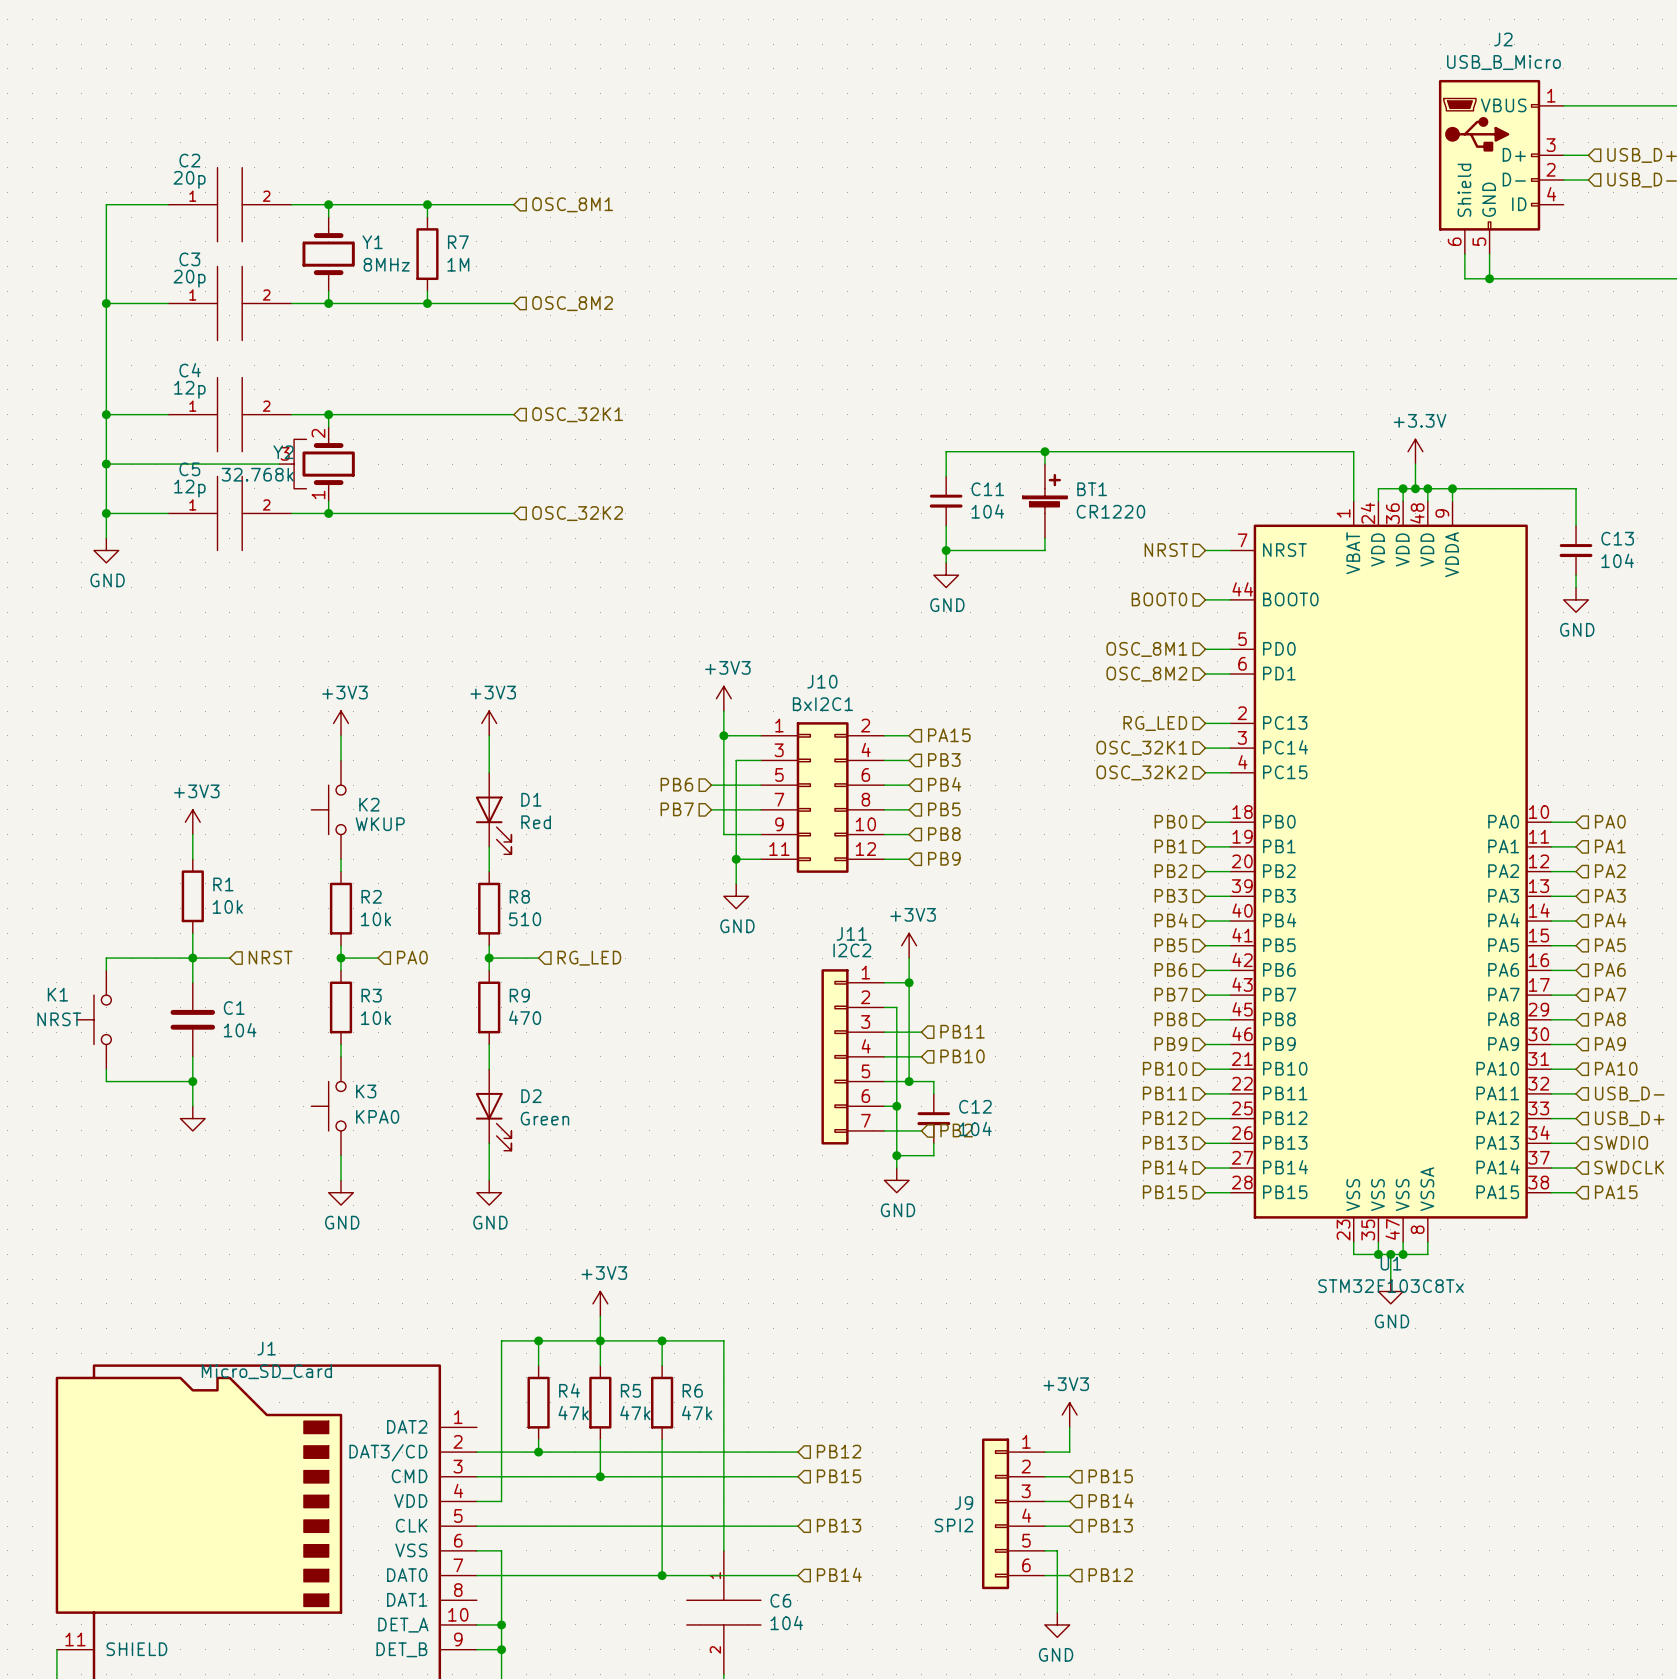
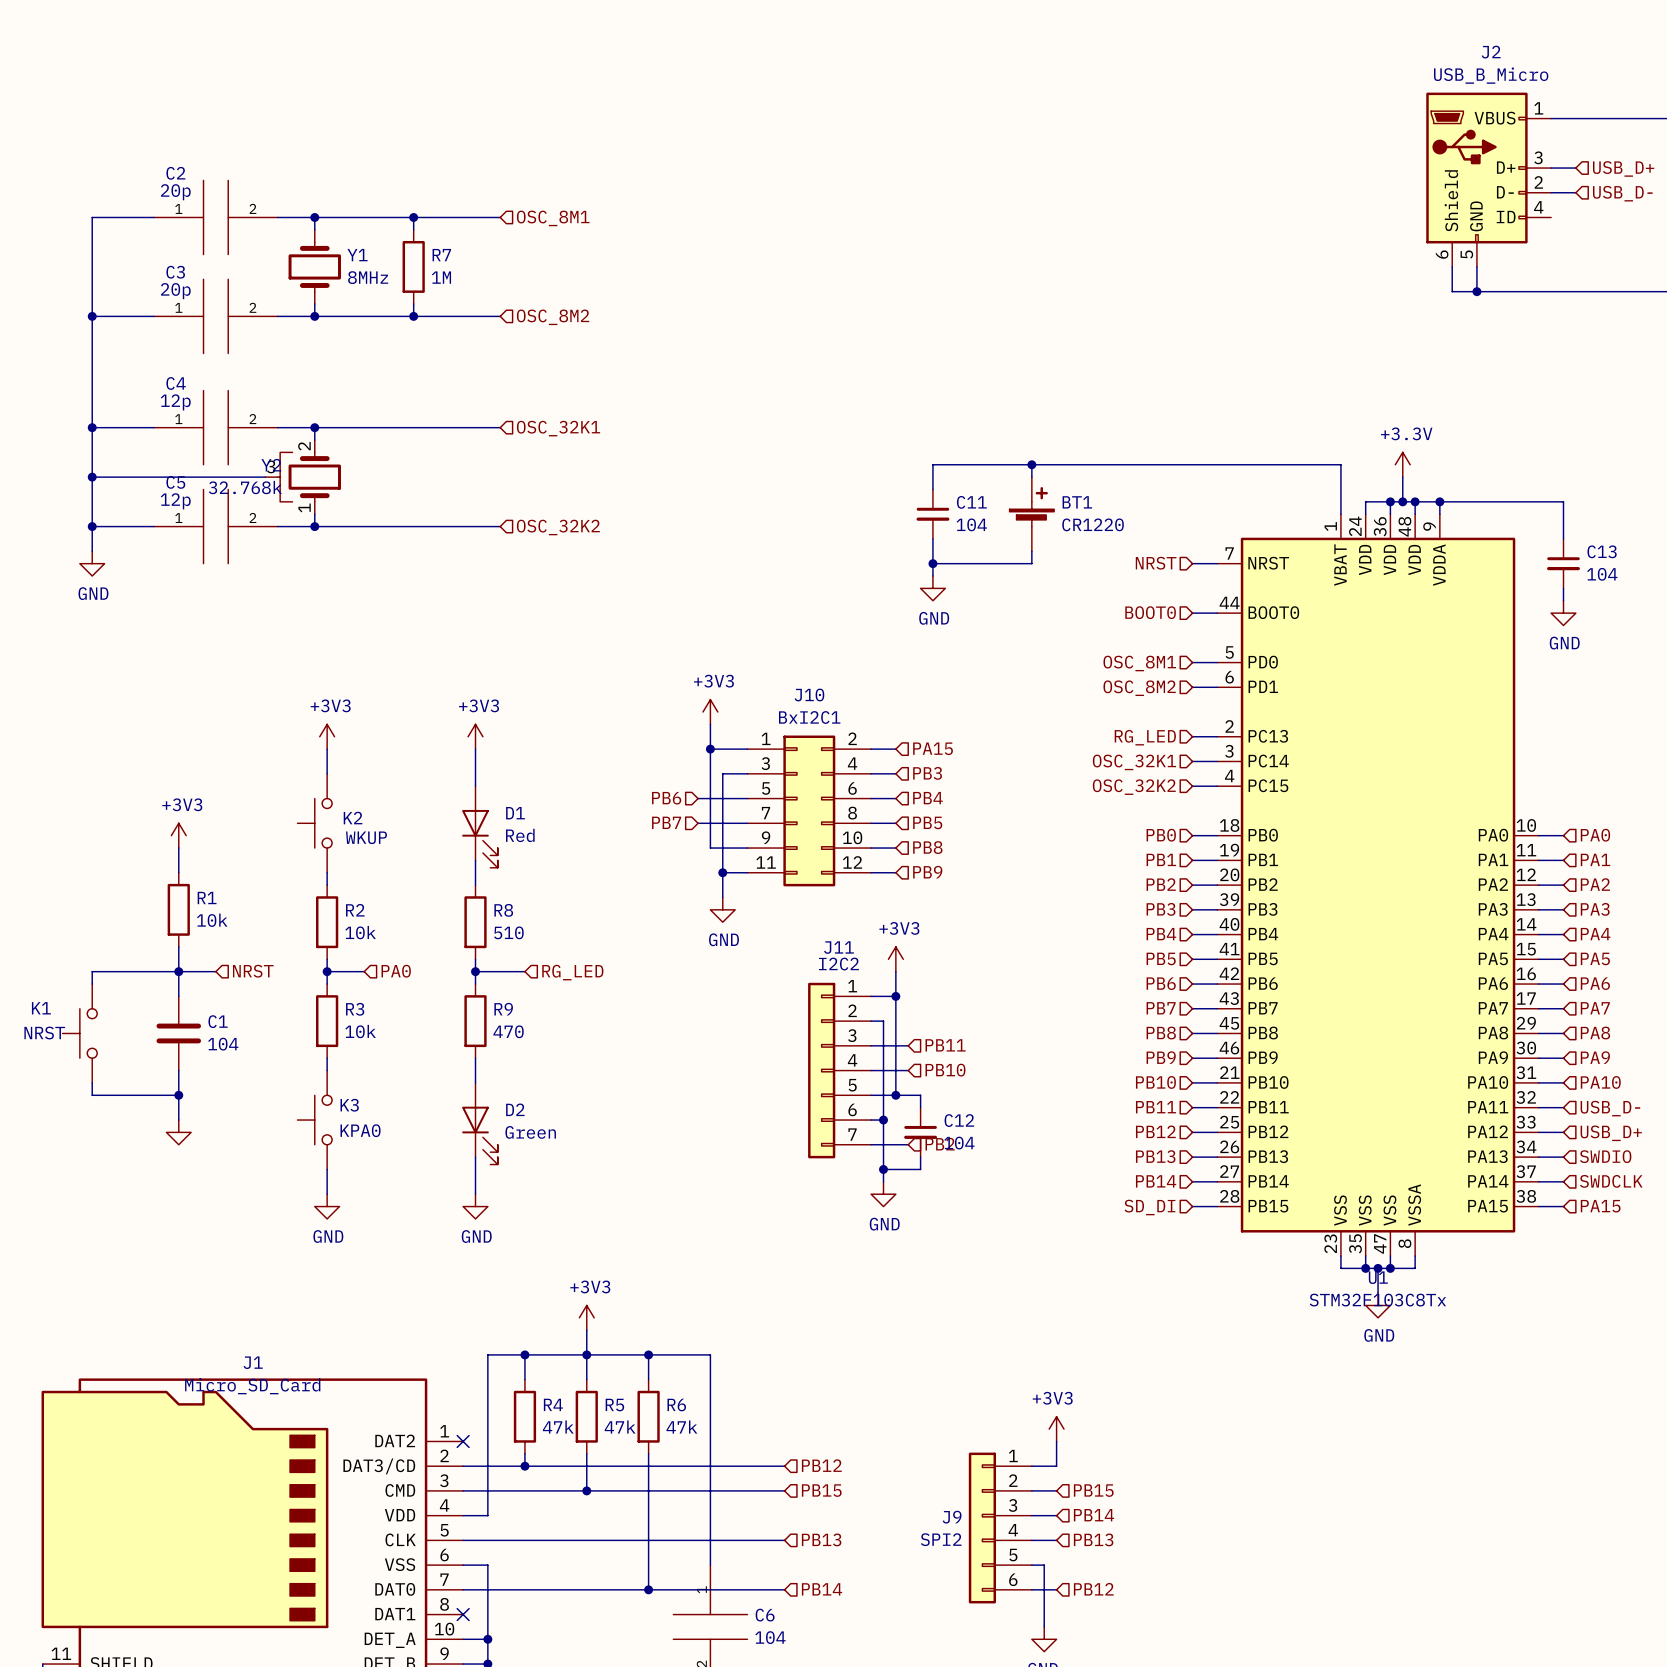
hierarchical label: PB15 (1165, 1192) -> SD_DI (1149, 1207)
no-connect mark: none -> (463, 1441)
no-connect mark: none -> (463, 1614)

